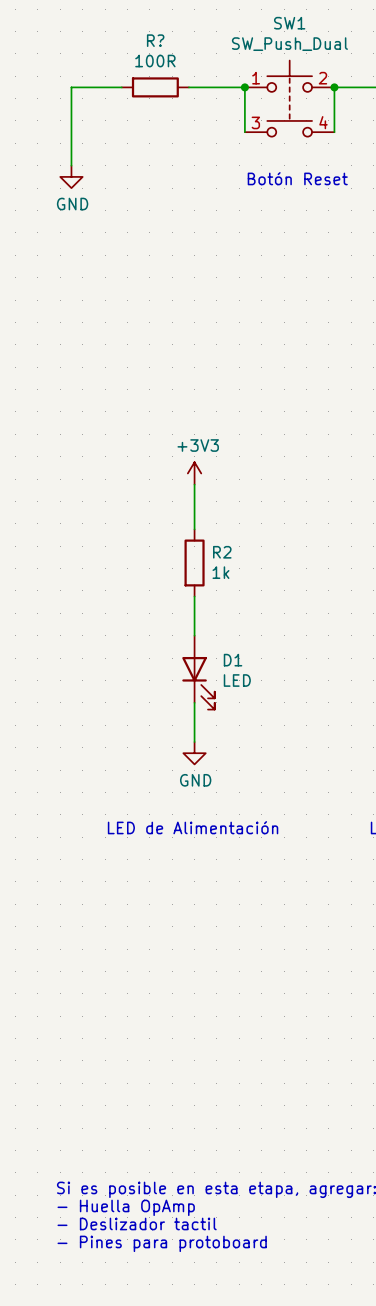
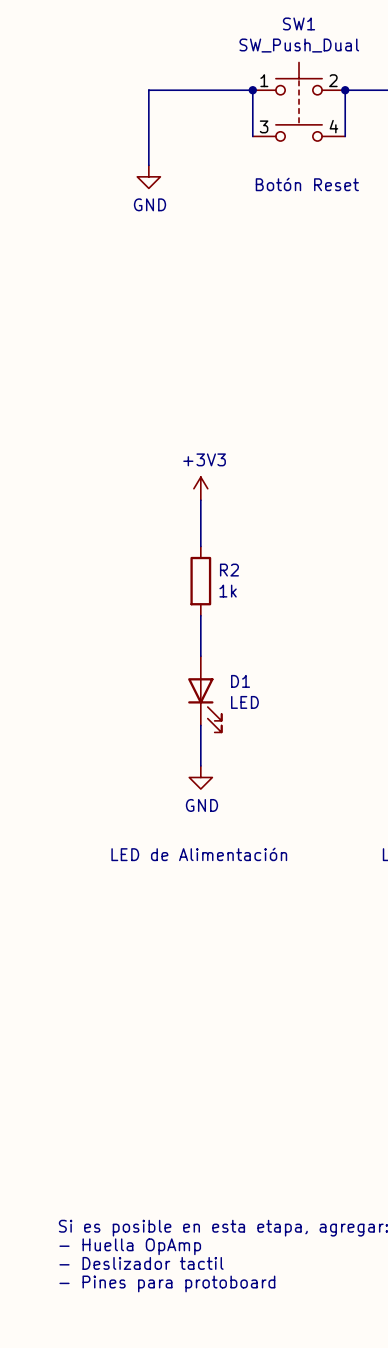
wire: (121, 87) (71, 87) (71, 165) -> none
R?: 100R (155, 87) -> none
wire: none -> (195, 90) (148, 90) (148, 165)
power symbol position: GND (71, 176) -> GND (148, 176)

